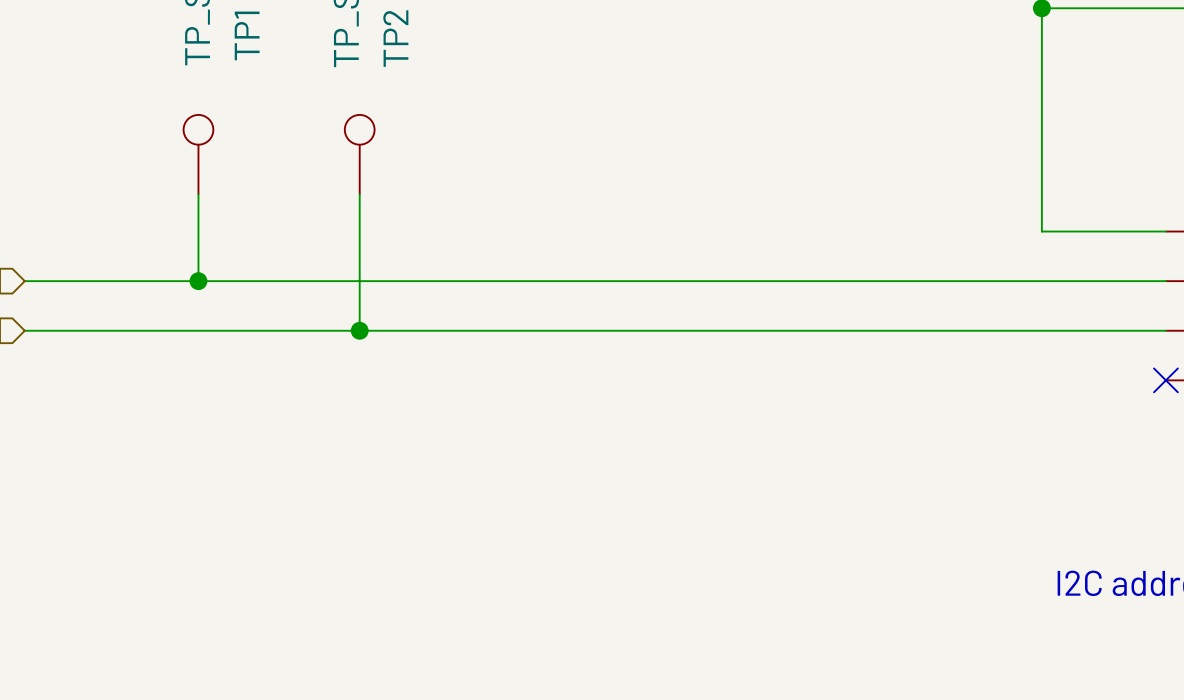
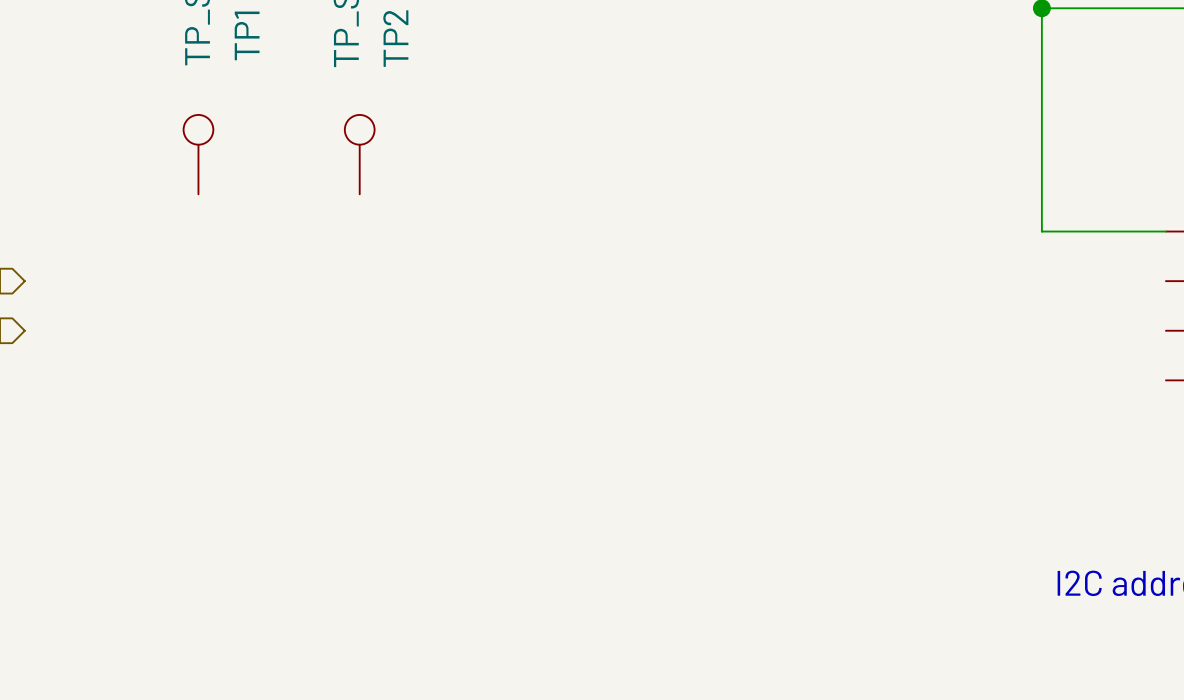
wire: (198, 194) (198, 281) -> none
wire: (359, 194) (359, 330) -> none
wire: (24, 281) (1165, 281) -> none
junction: (198, 281) -> none
wire: (24, 330) (1165, 330) -> none
junction: (359, 330) -> none
no-connect mark: (1165, 380) -> none

